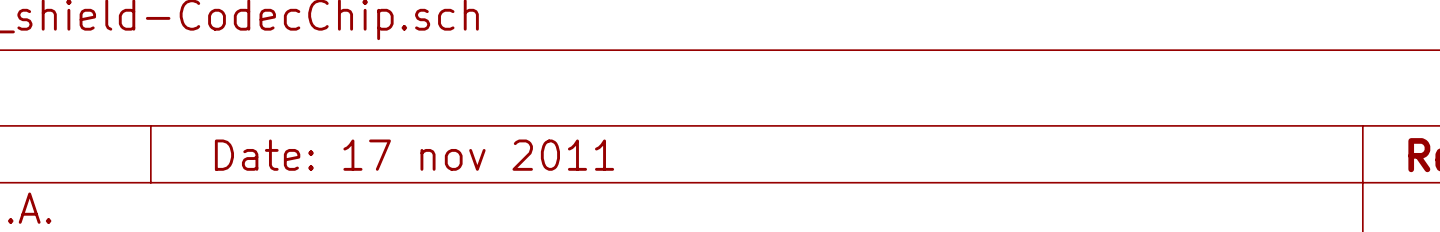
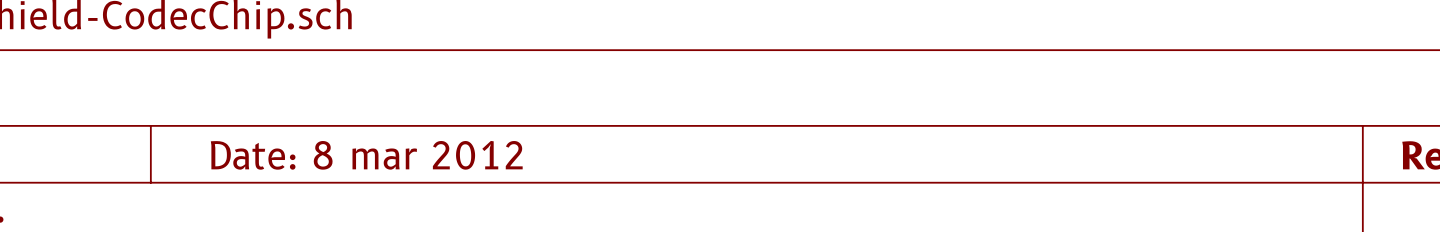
title block: Date: 17 nov 2011 (414, 155) -> Date: 8 mar 2012 (366, 155)

